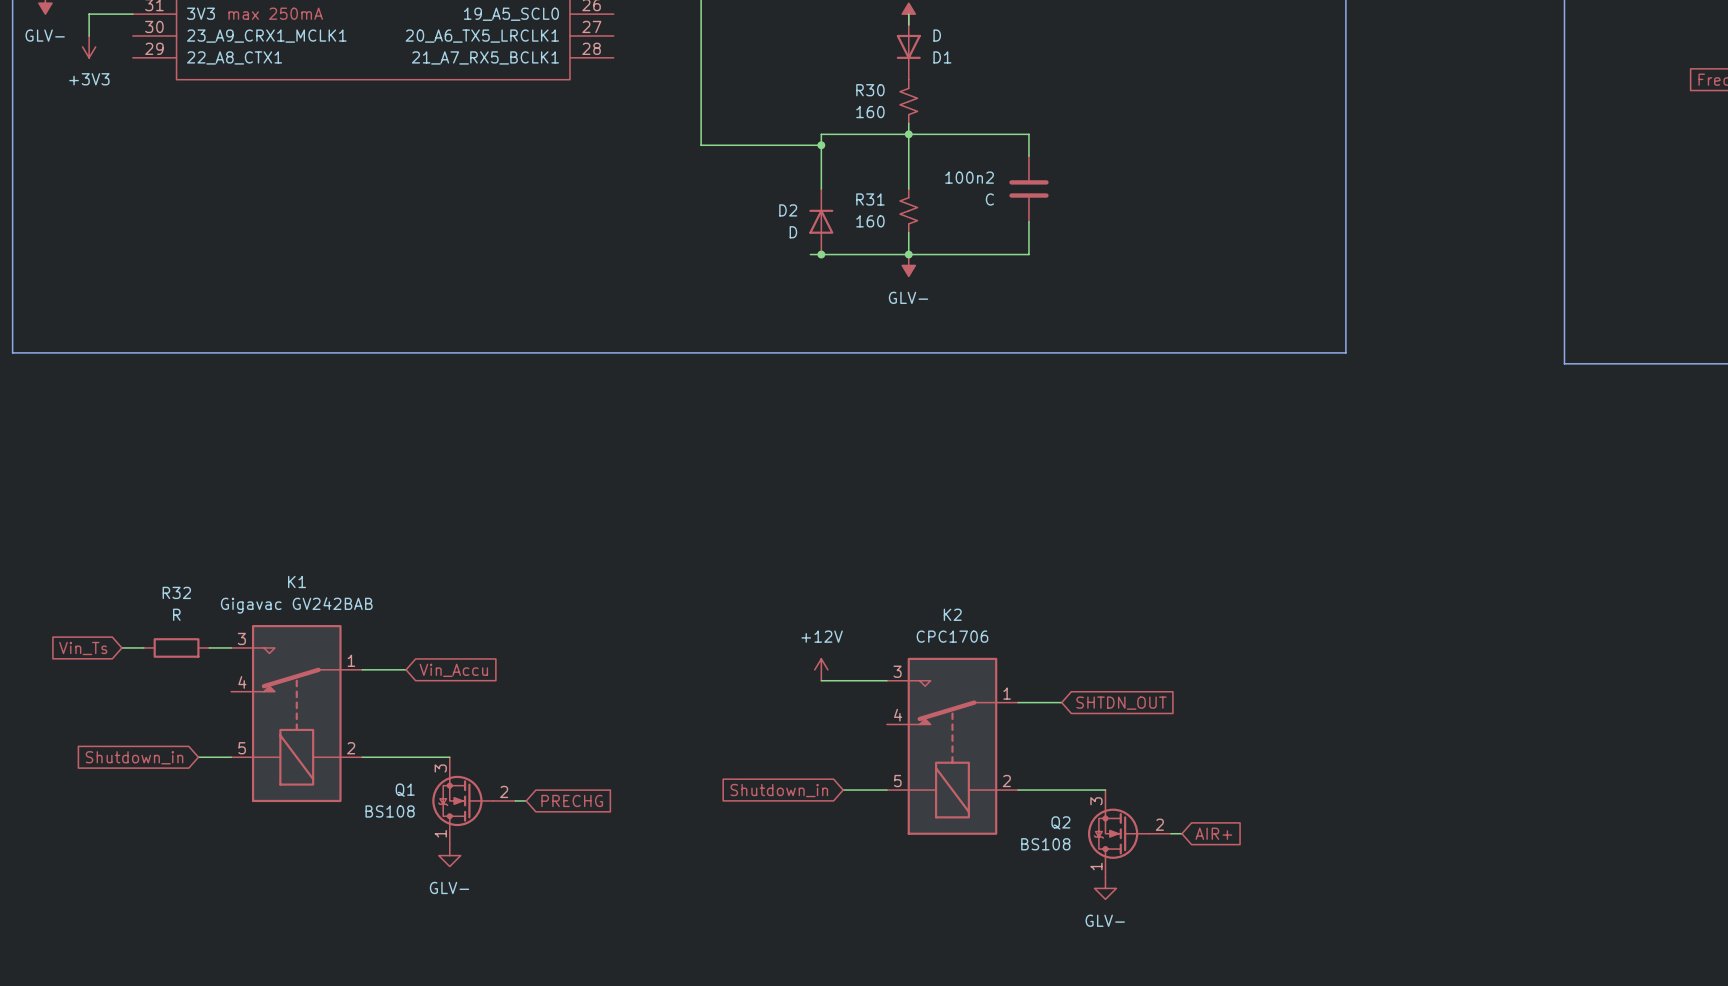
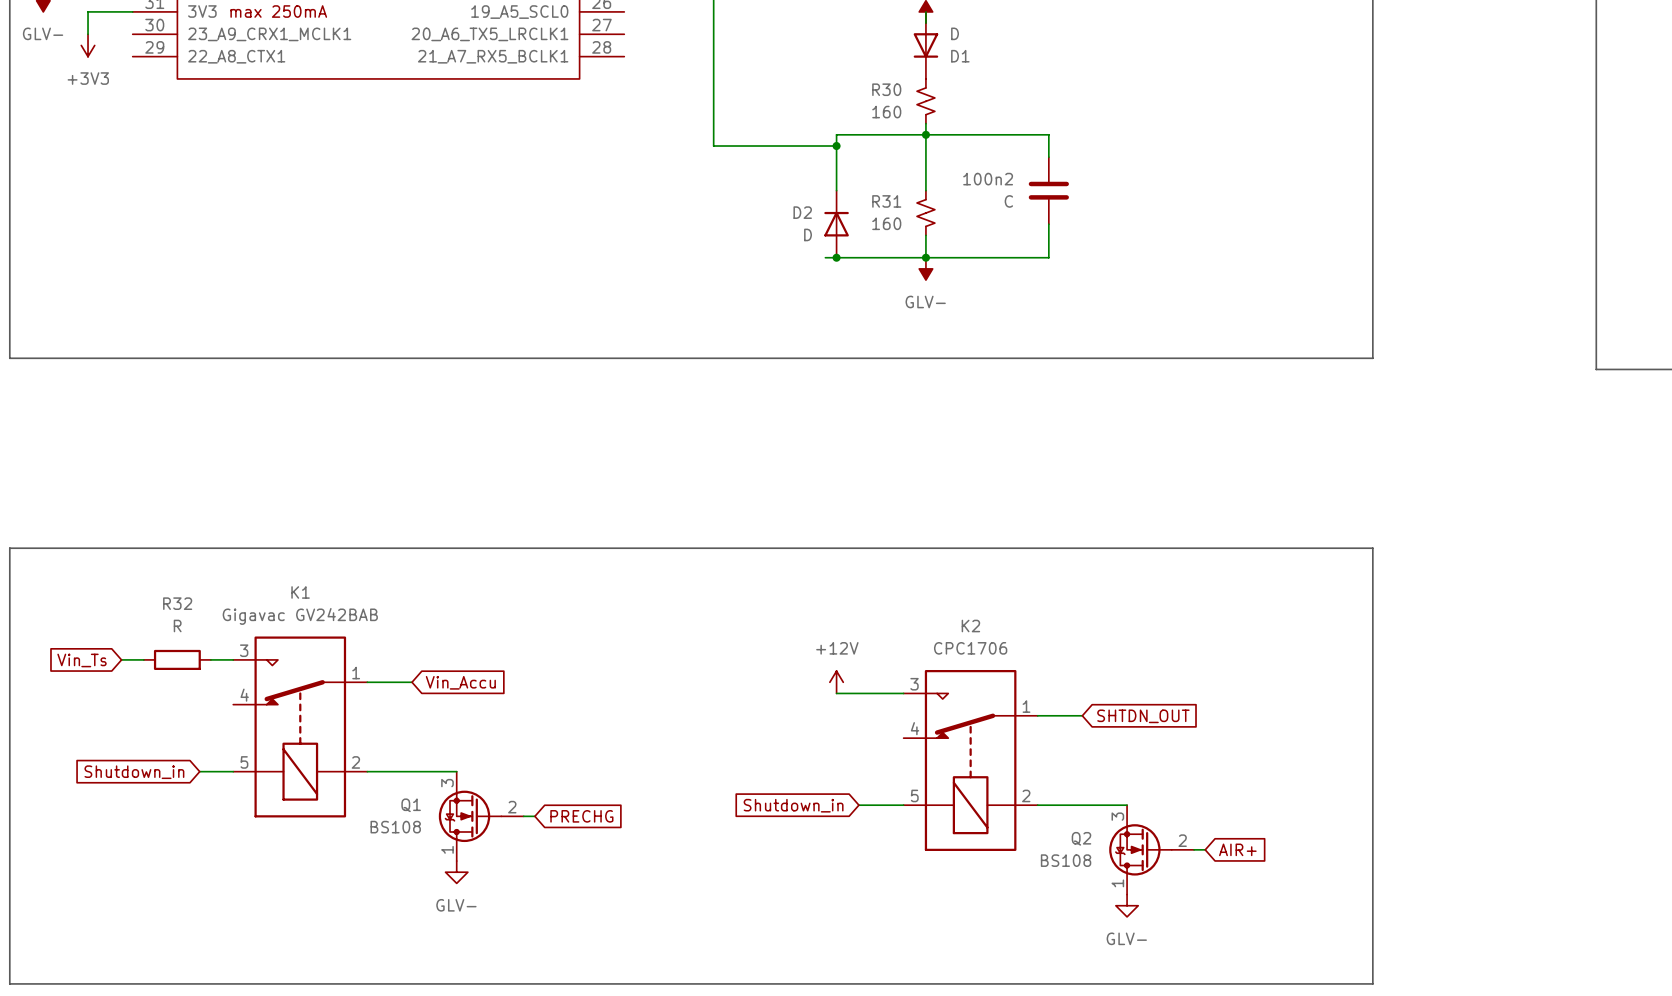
line: none -> (9, 548) (1372, 548) (1372, 983) (9, 983) (9, 548)

